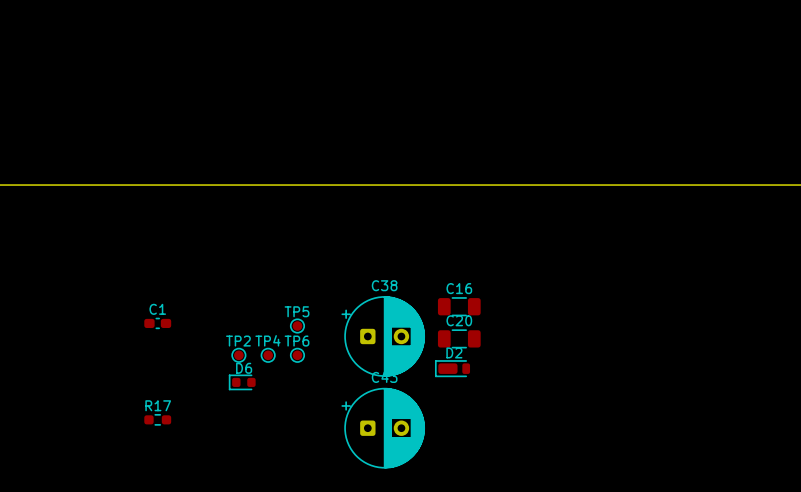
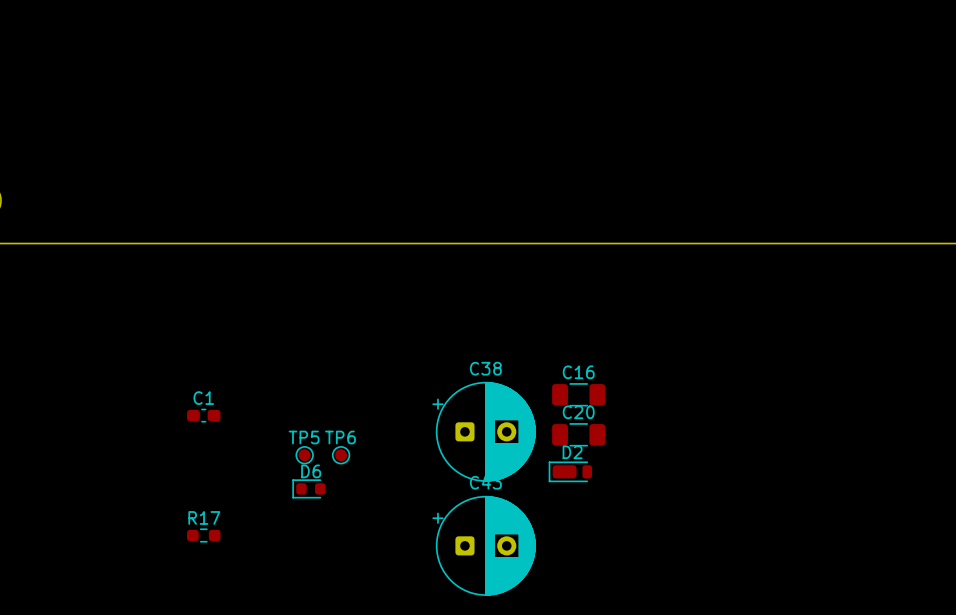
TP5: (297, 326) -> none
TP4 name: TP4 (267, 340) -> TP6 (340, 437)
TP2 name: TP2 (238, 341) -> TP5 (304, 437)
TP6: (297, 355) -> none

